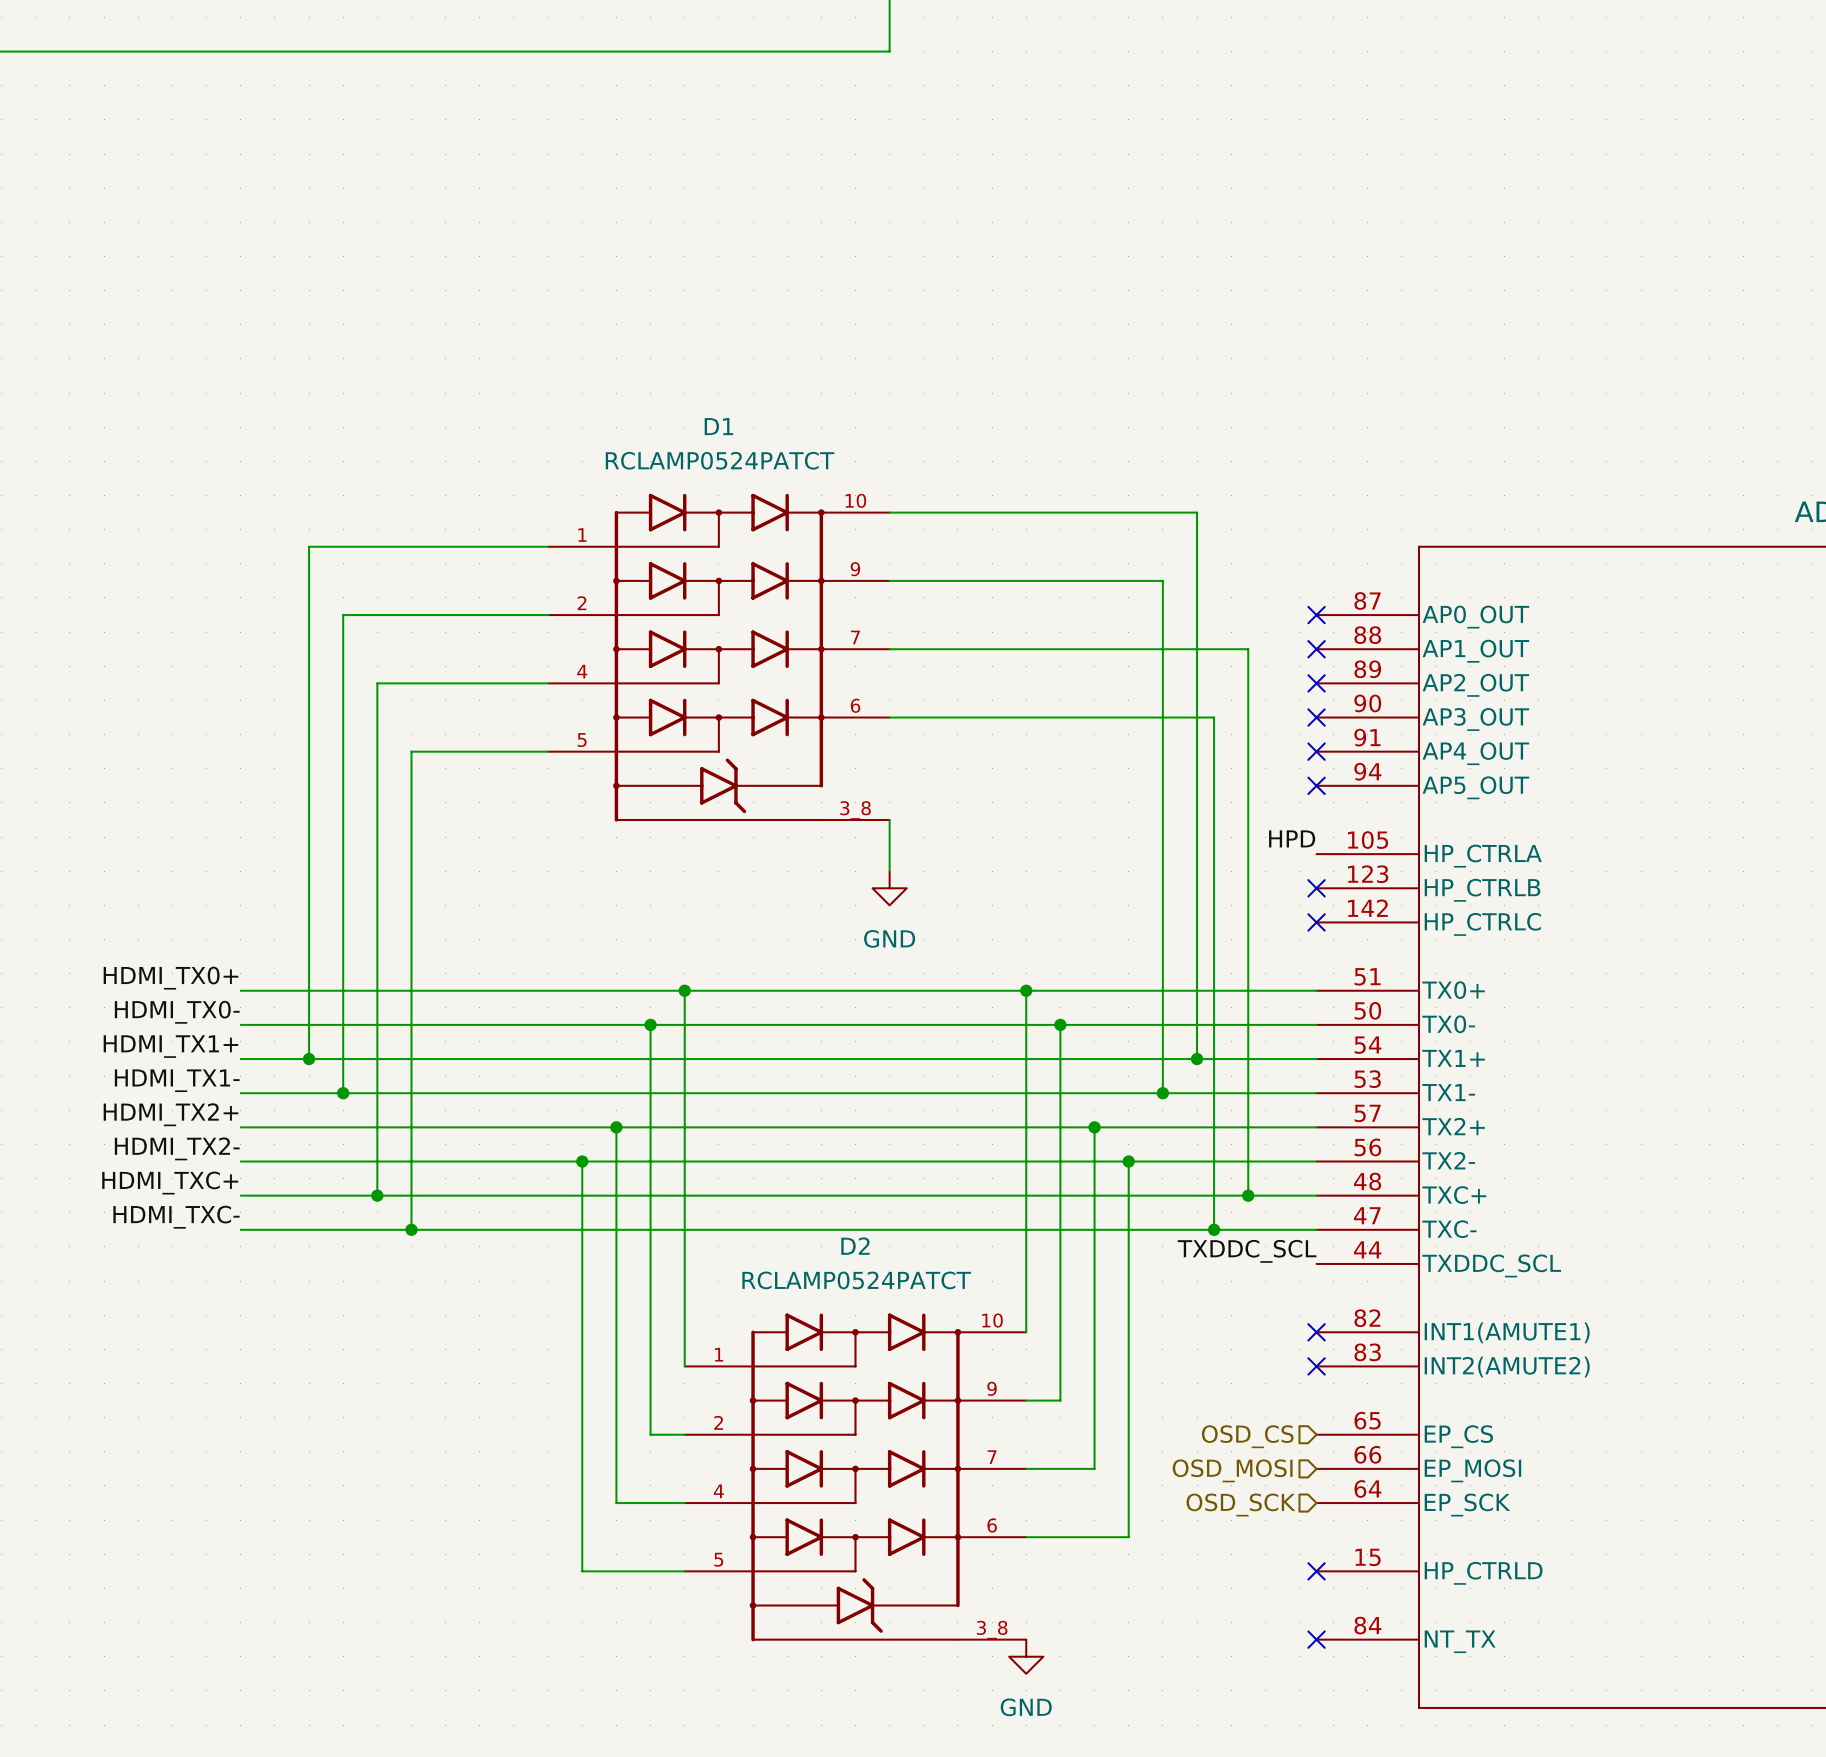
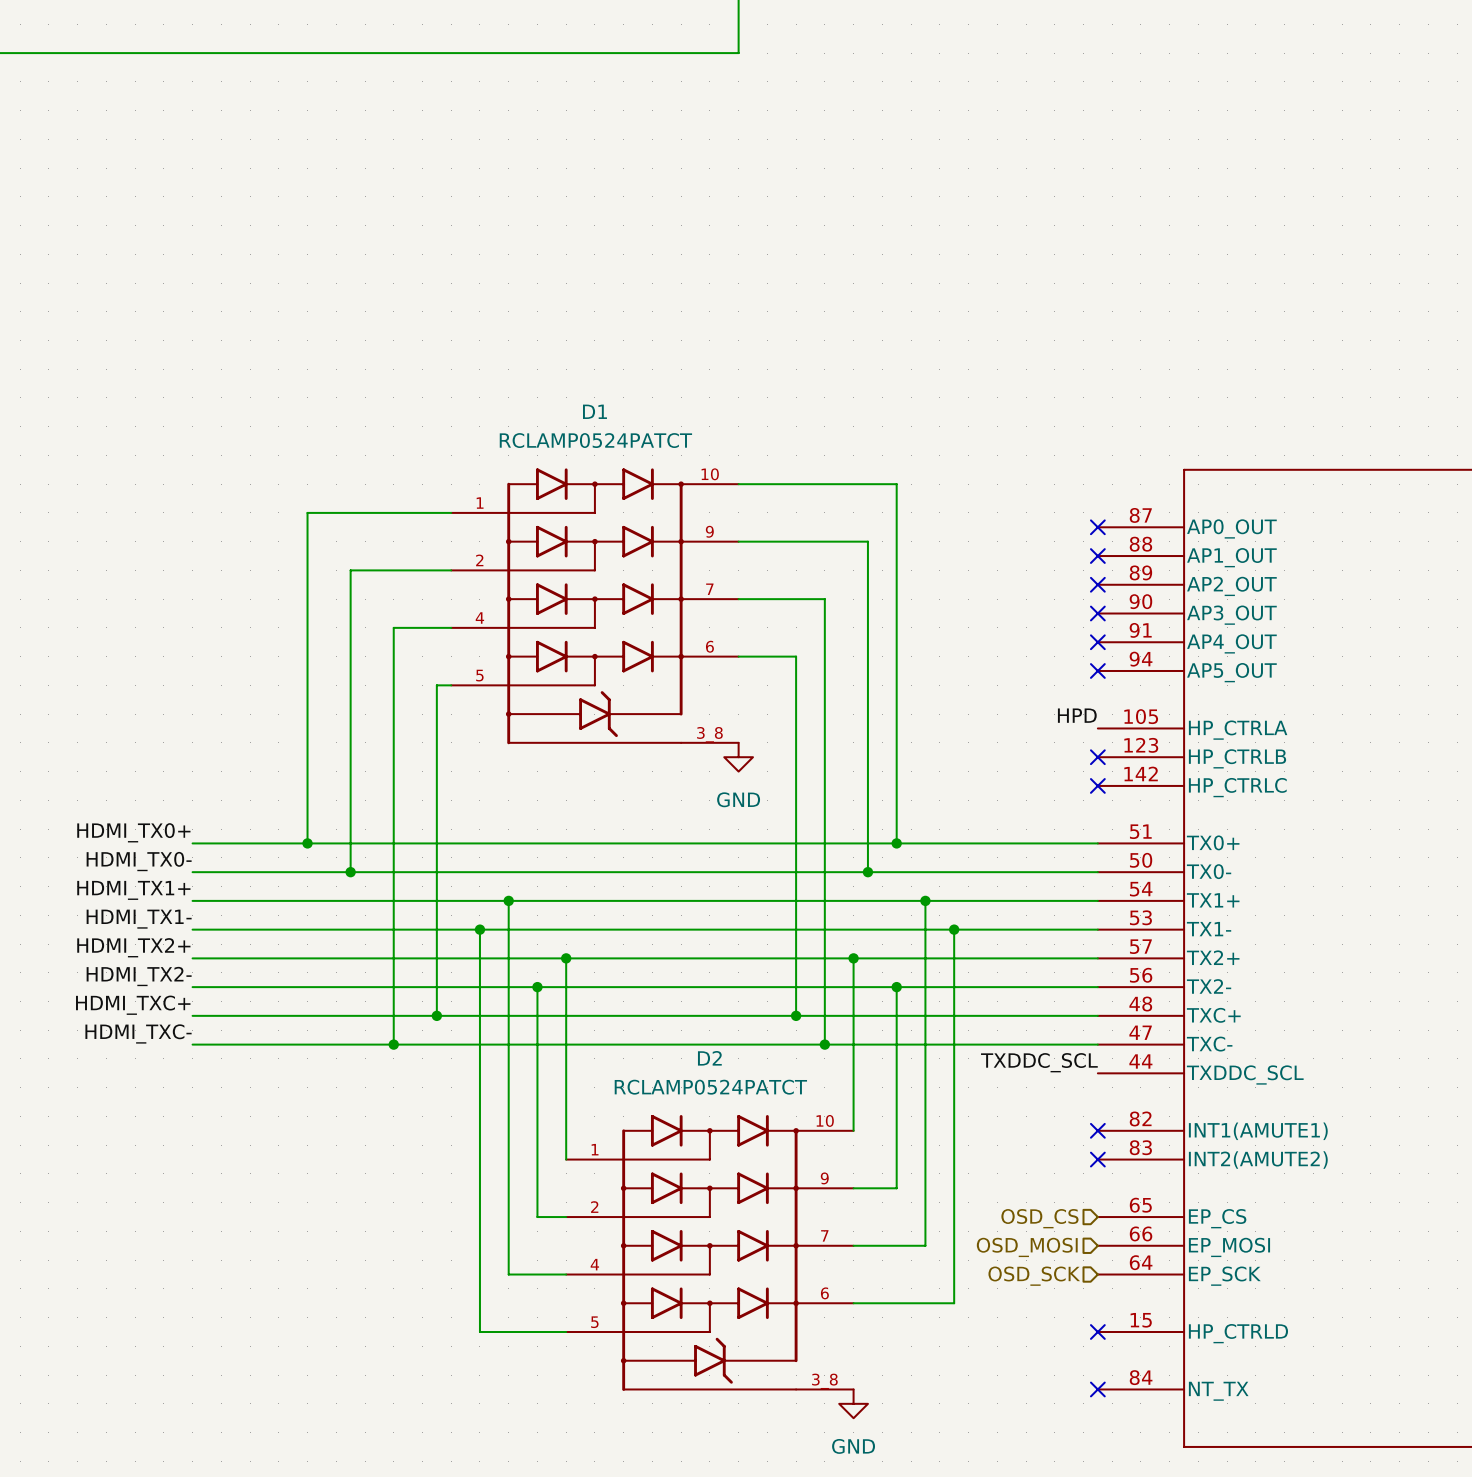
wire: (889, 512) (1197, 512) (1197, 1059) -> none
wire: (548, 546) (309, 546) (309, 1059) -> none
wire: none -> (738, 484) (896, 484) (896, 843)
wire: (889, 580) (1162, 580) (1162, 1093) -> none
wire: (548, 615) (343, 615) (343, 1093) -> none
wire: none -> (738, 541) (867, 541) (867, 872)
wire: (889, 649) (1248, 649) (1248, 1195) -> none
D1 position: (718, 657) -> (594, 606)
wire: none -> (451, 570) (350, 570) (350, 872)
wire: (377, 683) (548, 683) -> (307, 584) (307, 512) (451, 512)
wire: none -> (738, 599) (824, 599) (824, 1044)
wire: (889, 717) (1214, 717) (1214, 1229) -> none
wire: none -> (451, 627) (393, 627) (393, 1044)
wire: (548, 751) (411, 751) (411, 1229) -> none
wire: none -> (738, 656) (796, 656) (796, 1015)
wire: none -> (451, 685) (436, 685) (436, 1015)
wire: (889, 819) (889, 871) -> none
wire: (377, 990) (377, 1195) -> none
junction: none -> (307, 843)
wire: (684, 990) (684, 1127) -> none
junction: (684, 990) -> none
wire: (1026, 990) (1026, 1127) -> none
junction: (1026, 990) -> none
junction: none -> (896, 843)
junction: none -> (350, 872)
wire: (650, 1024) (650, 1161) -> none
junction: (650, 1024) -> none
wire: (1060, 1024) (1060, 1400) -> (896, 987) (896, 1188) (882, 1188)
junction position: (1060, 1024) -> (867, 872)
junction: (309, 1059) -> none
wire: none -> (508, 900) (508, 958)
junction: none -> (508, 900)
junction: none -> (925, 900)
junction: (1197, 1059) -> none
junction: (343, 1093) -> none
wire: none -> (479, 929) (479, 987)
junction: none -> (479, 929)
junction position: (1162, 1093) -> (954, 929)
junction: (616, 1127) -> none
junction: none -> (566, 958)
junction: none -> (853, 958)
wire: (1094, 1127) (1094, 1468) -> (925, 900) (925, 1245) (911, 1245)
junction: (1094, 1127) -> none
junction: (582, 1161) -> none
junction: none -> (537, 987)
junction: none -> (896, 987)
wire: (1128, 1161) (1128, 1537) -> (954, 929) (954, 1303) (939, 1303)
junction: (1128, 1161) -> none
junction: (377, 1195) -> none
junction: none -> (436, 1015)
junction: none -> (796, 1015)
junction: (1248, 1195) -> none
junction: (411, 1229) -> none
junction: none -> (393, 1044)
junction: none -> (824, 1044)
junction: (1214, 1229) -> none

